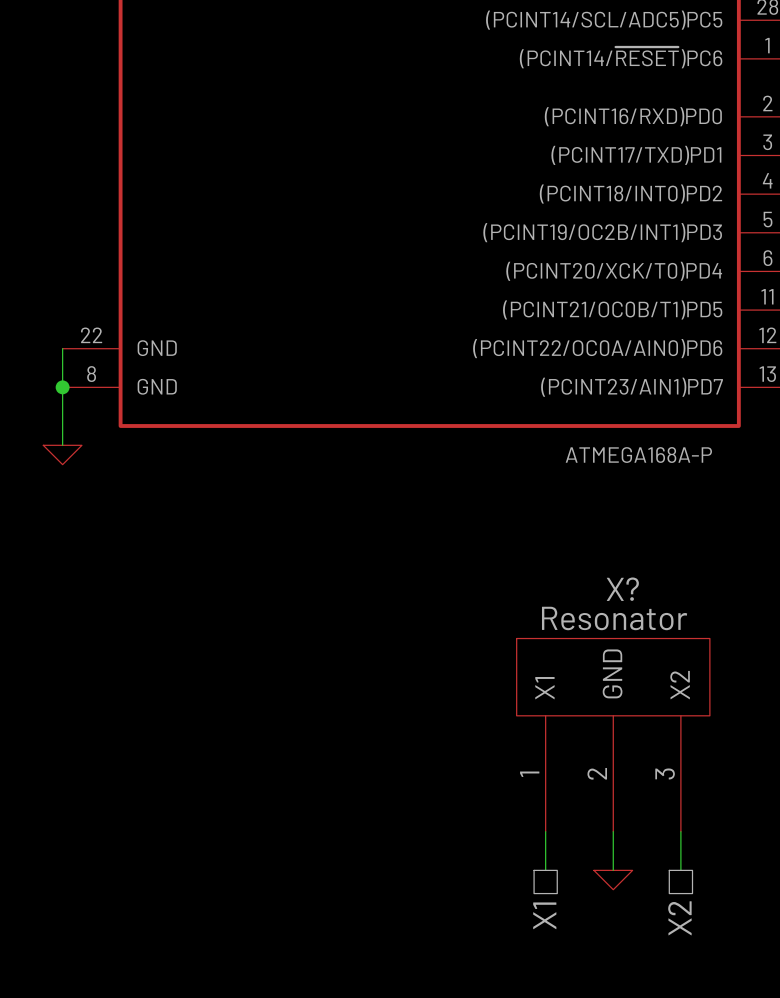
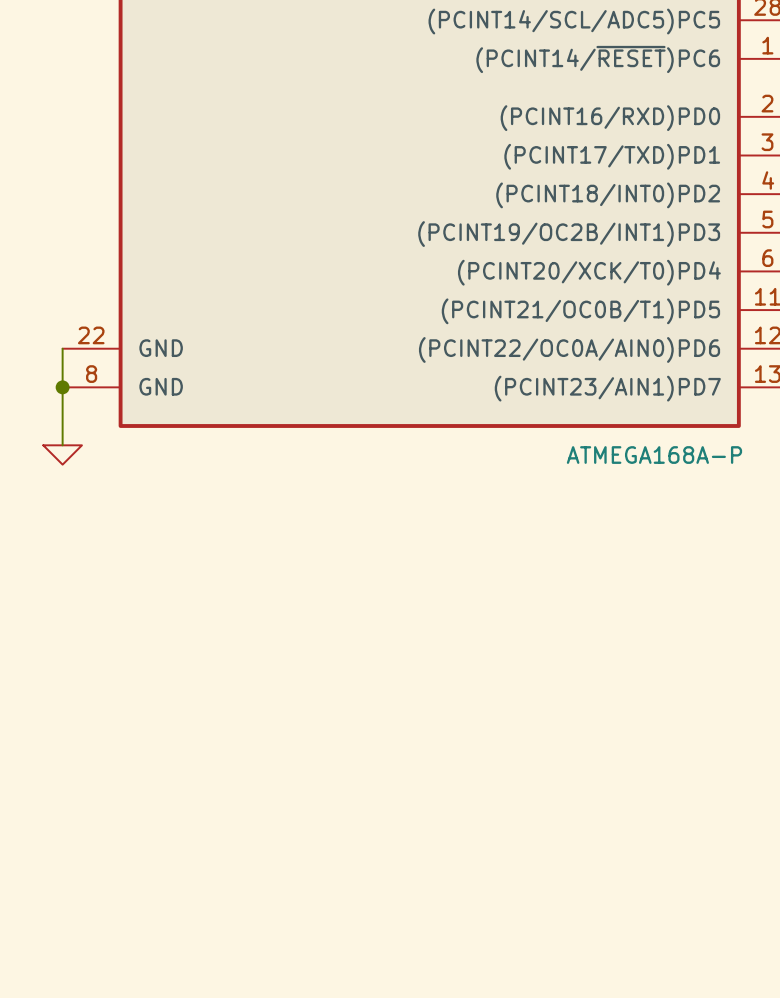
X?: Resonator (613, 735) -> none
wire: (545, 831) (545, 870) -> none
wire: (613, 831) (613, 870) -> none
wire: (680, 831) (680, 870) -> none
power symbol: (613, 880) -> none
hierarchical label: X1 (544, 915) -> none
hierarchical label: X2 (679, 918) -> none

